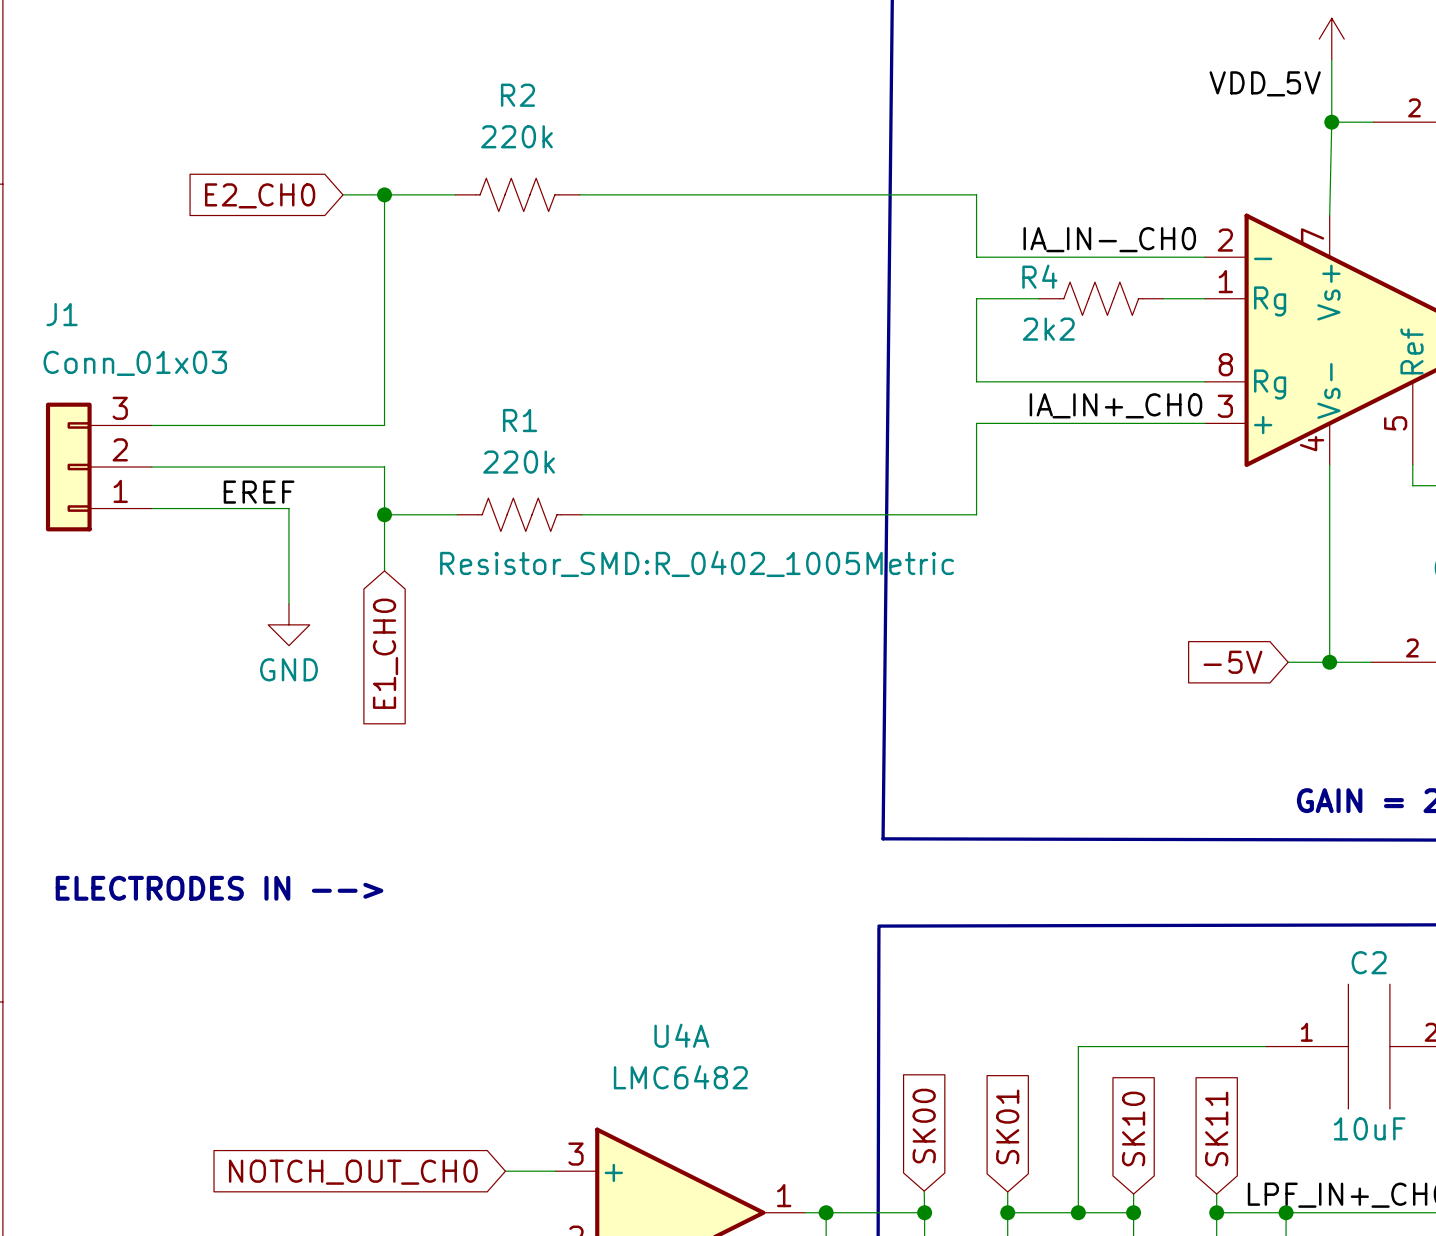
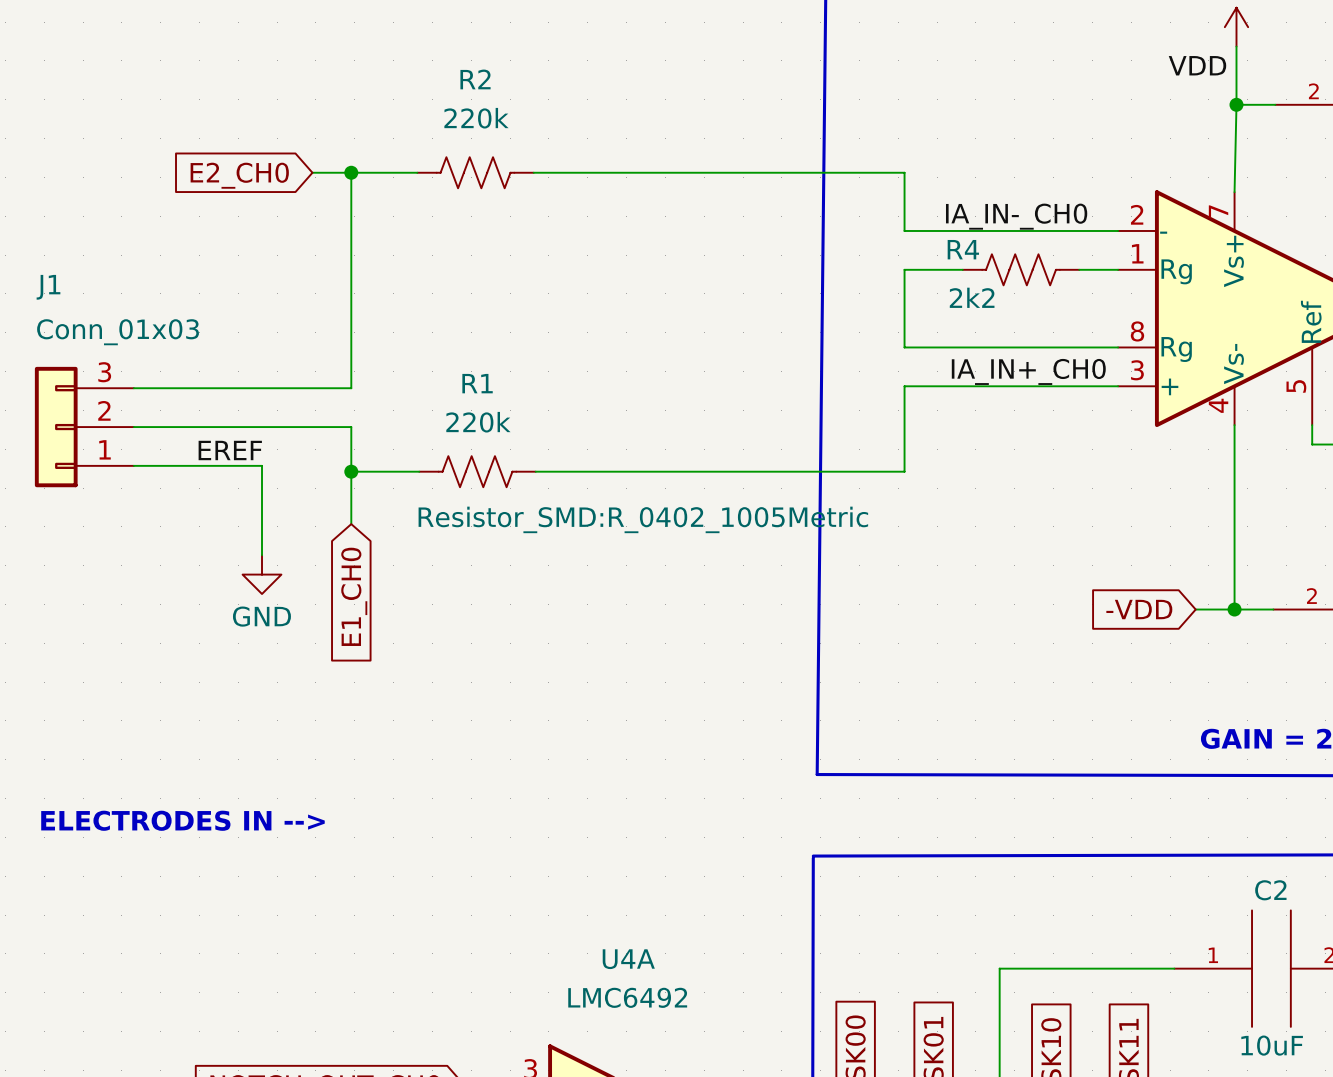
label: VDD_5V (1265, 83) -> VDD (1197, 65)
global label: -5V (1232, 662) -> -VDD (1139, 609)
U4A value: LMC6482 (680, 1077) -> LMC6492 (627, 997)

